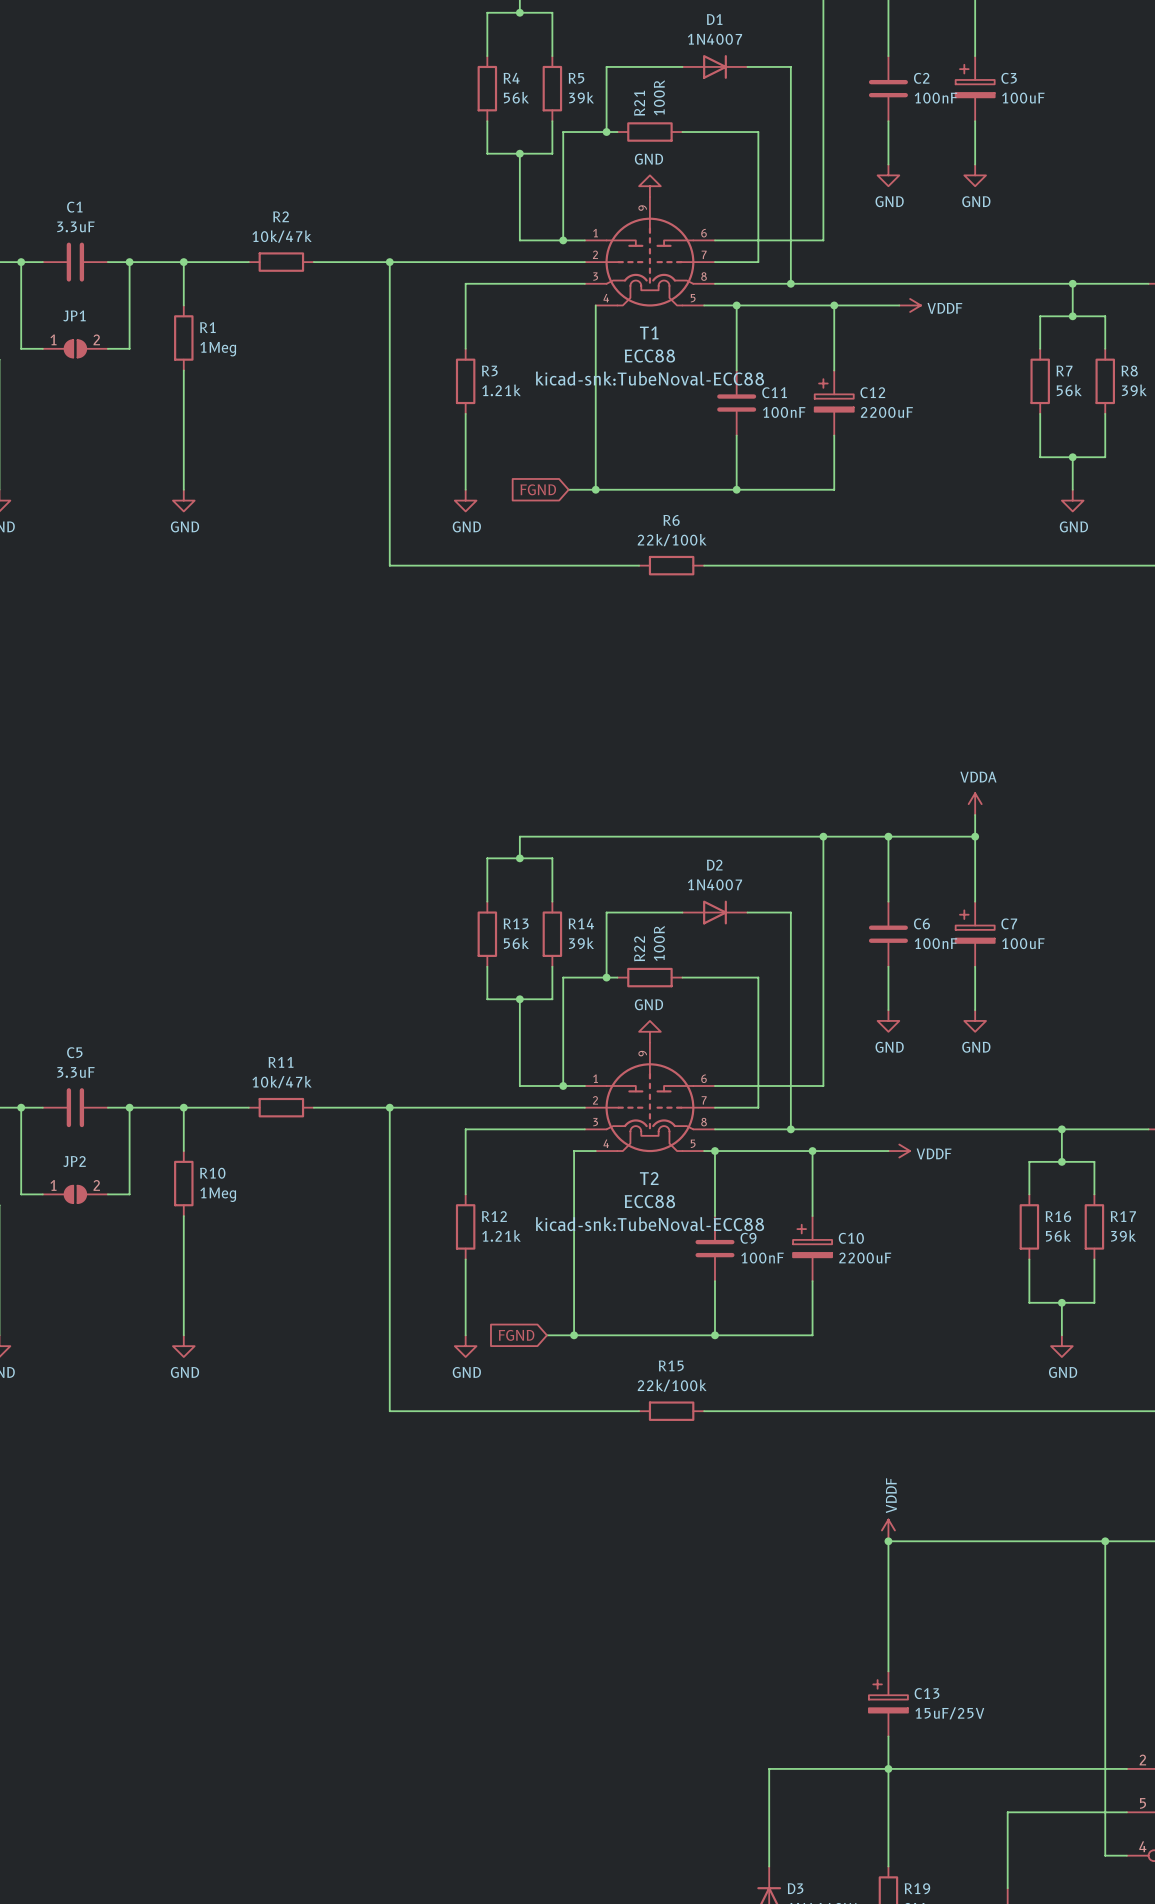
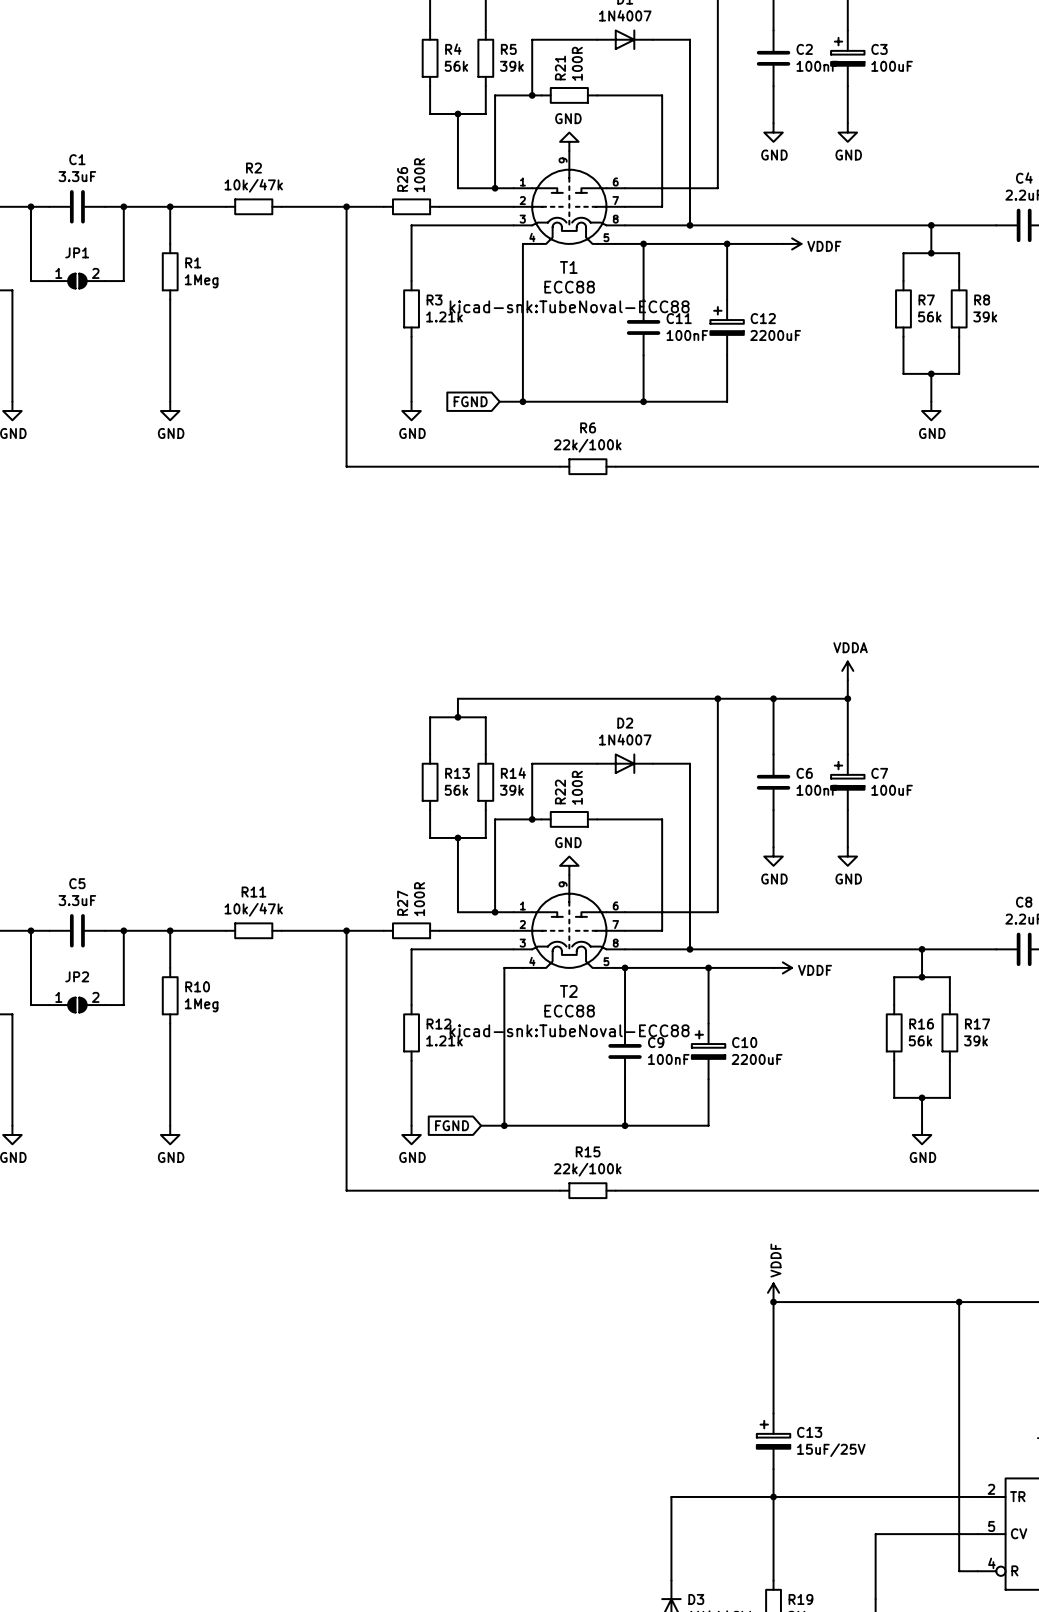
wire: (433, 262) (498, 262) -> none
R26: none -> 100R (411, 206)
wire: (433, 1107) (498, 1107) -> none
R27: none -> 100R (411, 930)

